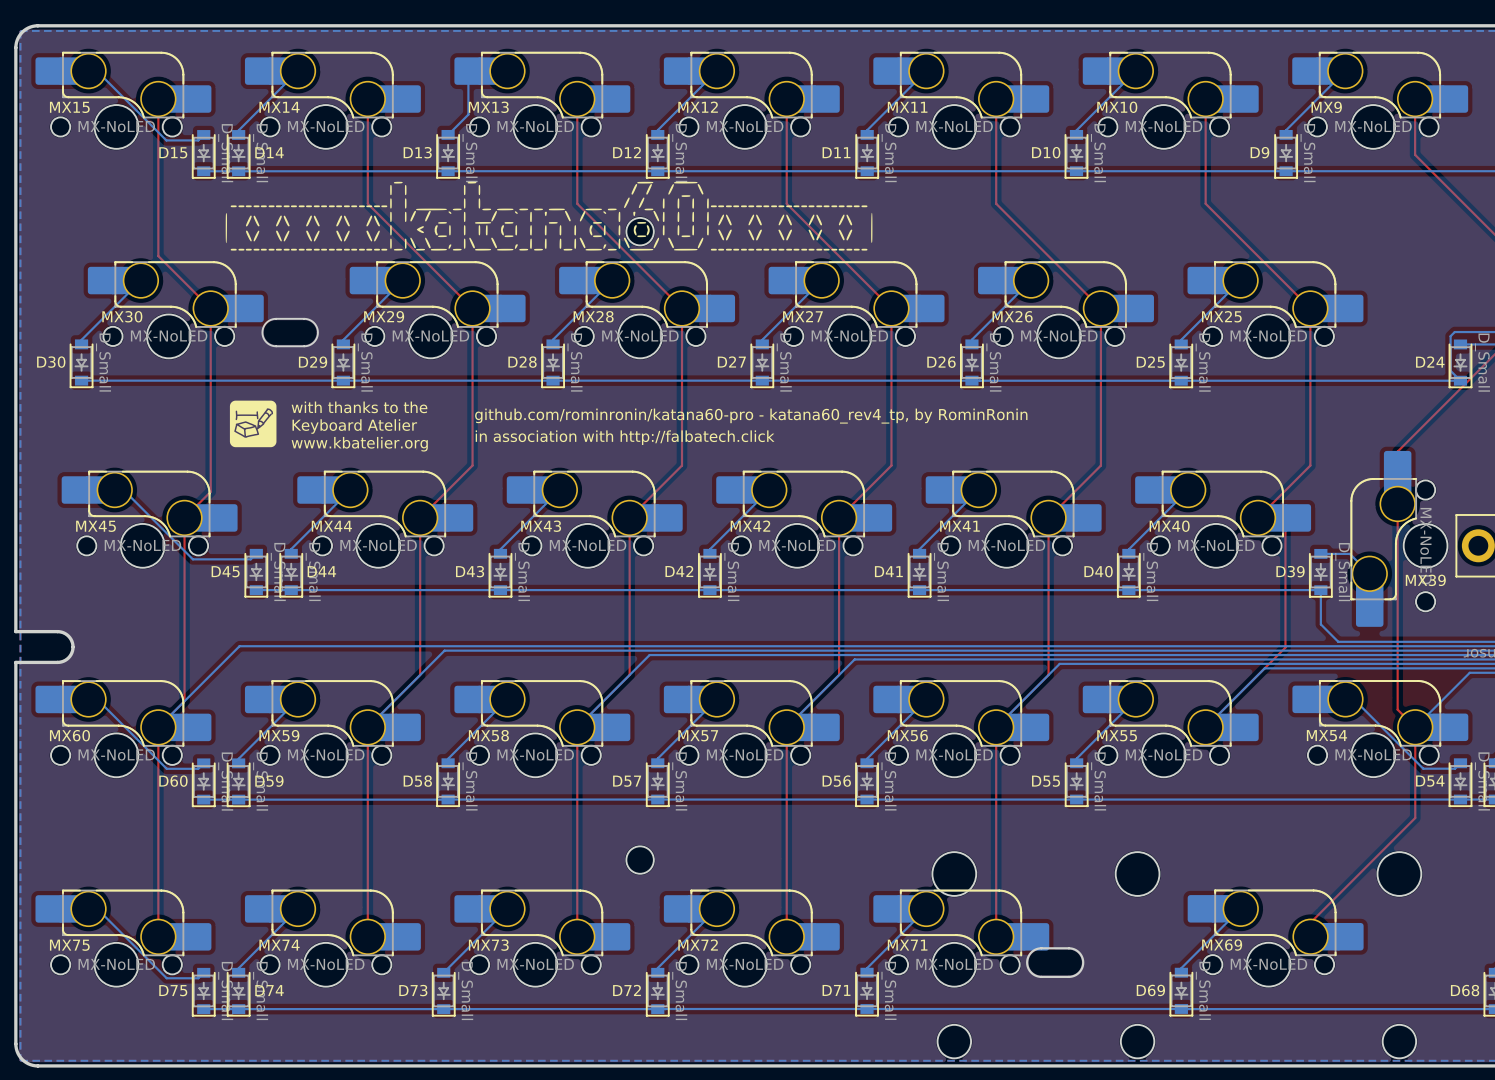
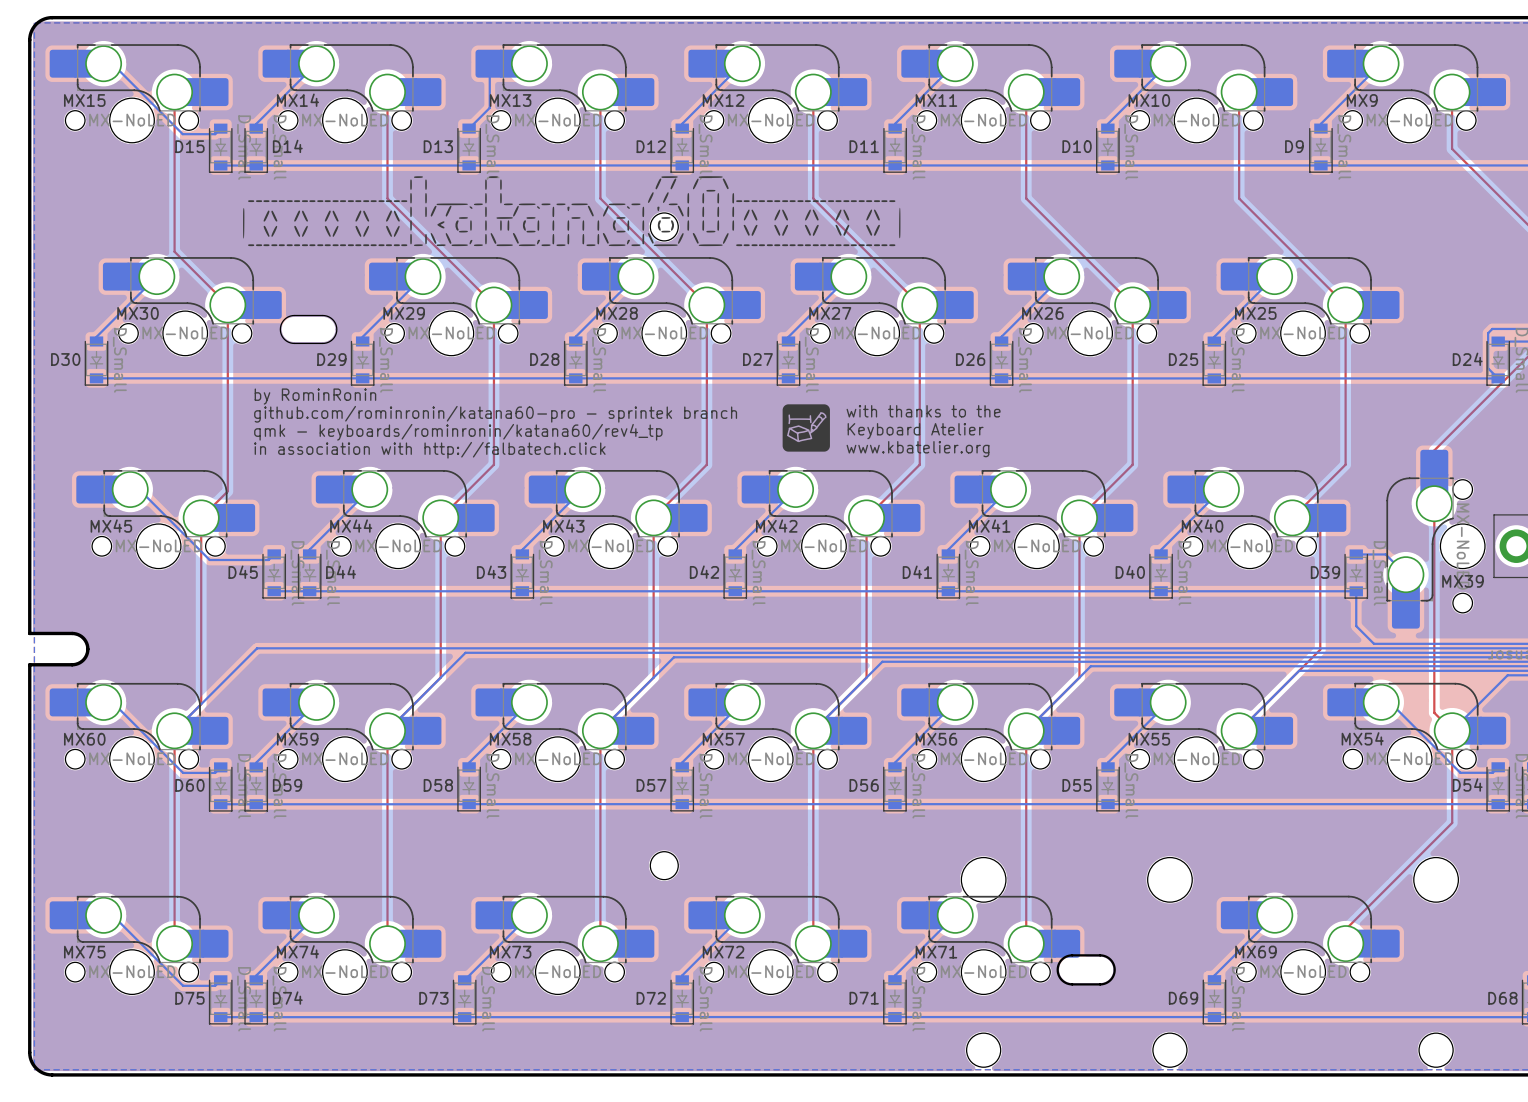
text: none -> by RominRonin (315, 396)
drawing: [229, 400, 277, 448] -> none
drawing: none -> [782, 404, 830, 452]
text: with thanks to the (359, 407) -> none
text: none -> with thanks to the (923, 411)
text: github.com/rominronin/katana60-pro - katana60_rev4_tp, by RominRonin (751, 416) -> github.com/rominronin/katana60-pro - sprintek branch (495, 414)
text: Keyboard Atelier (354, 426) -> none
text: none -> Keyboard Atelier (915, 431)
text: none -> qmk - keyboards/rominronin/katana60/rev4_tp (458, 432)
text position: in association with http://falbatech.click (625, 437) -> in association with http://falbatech.click (429, 450)
text: www.kbatelier.org (359, 444) -> none
text: none -> www.kbatelier.org (917, 449)

